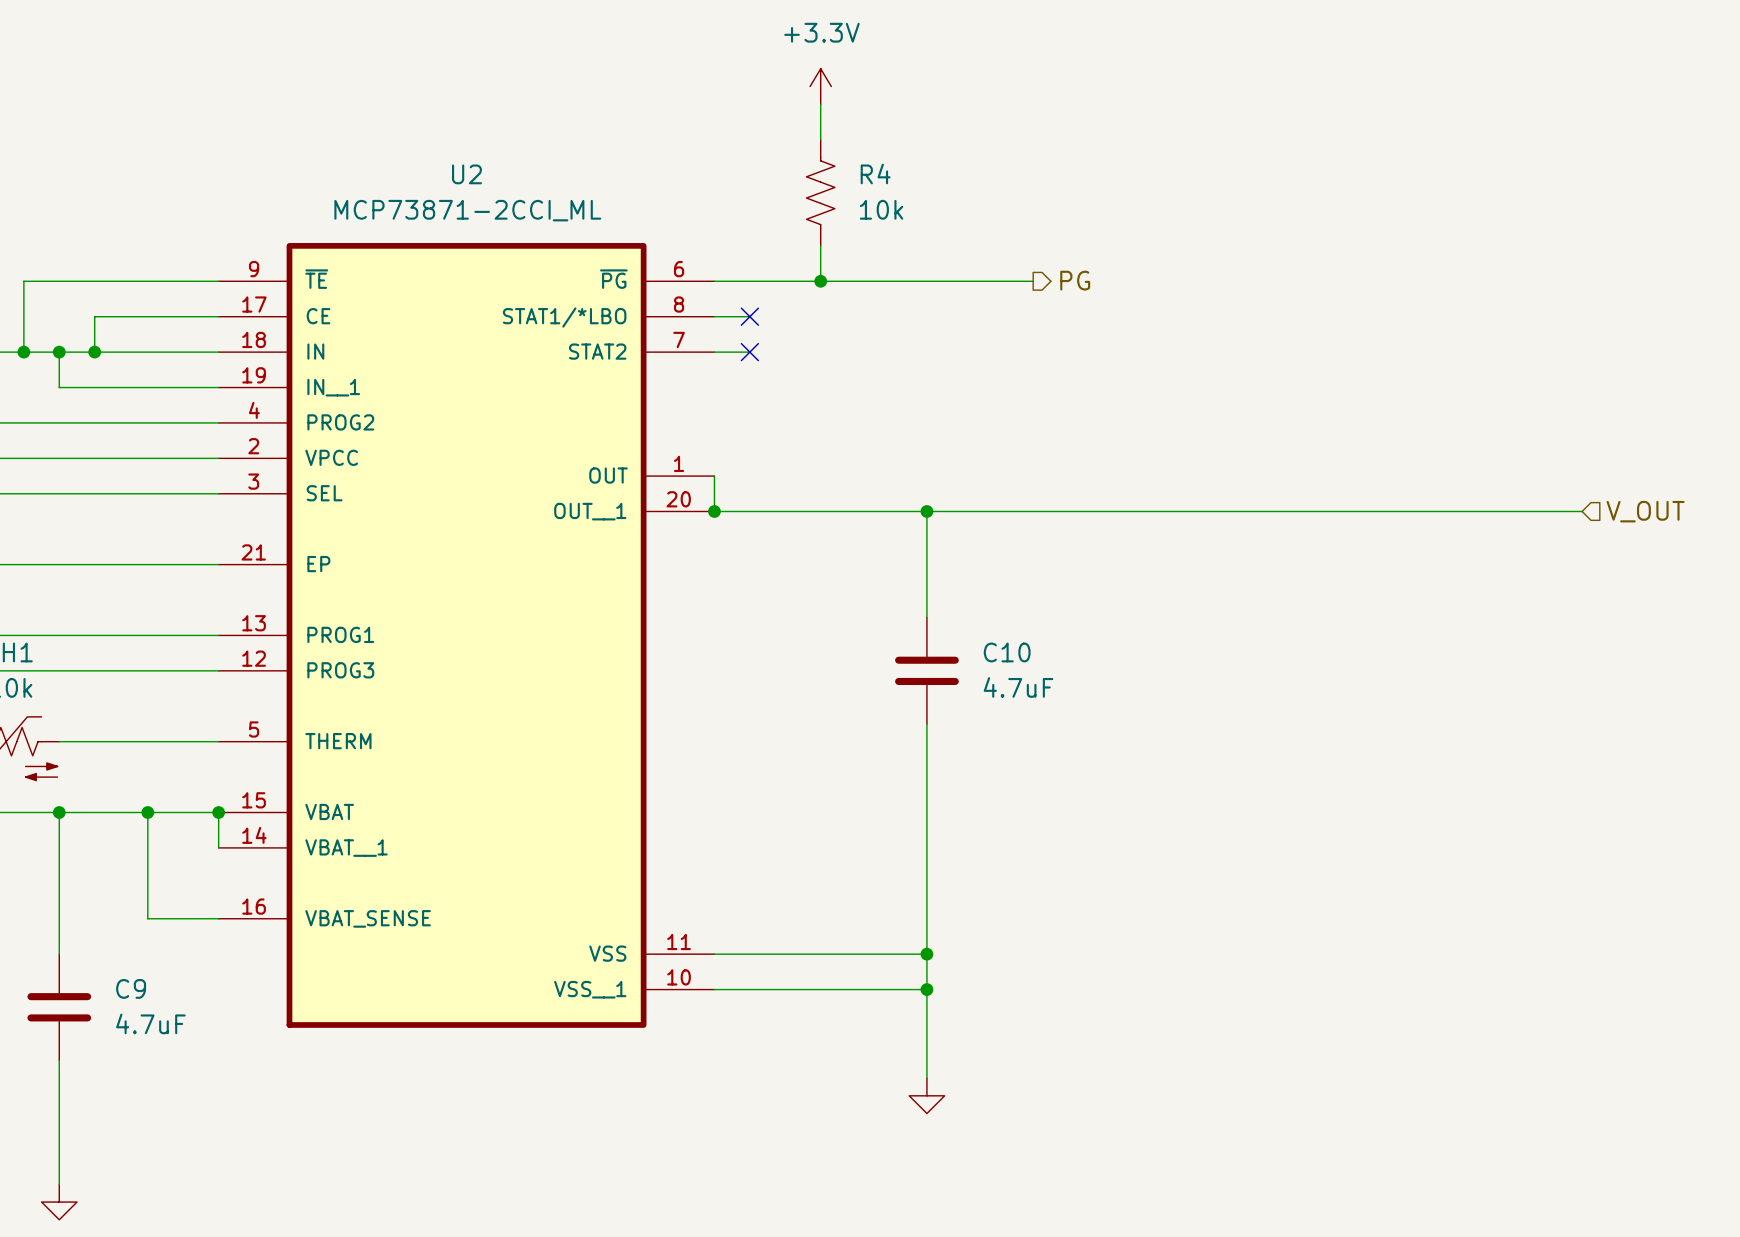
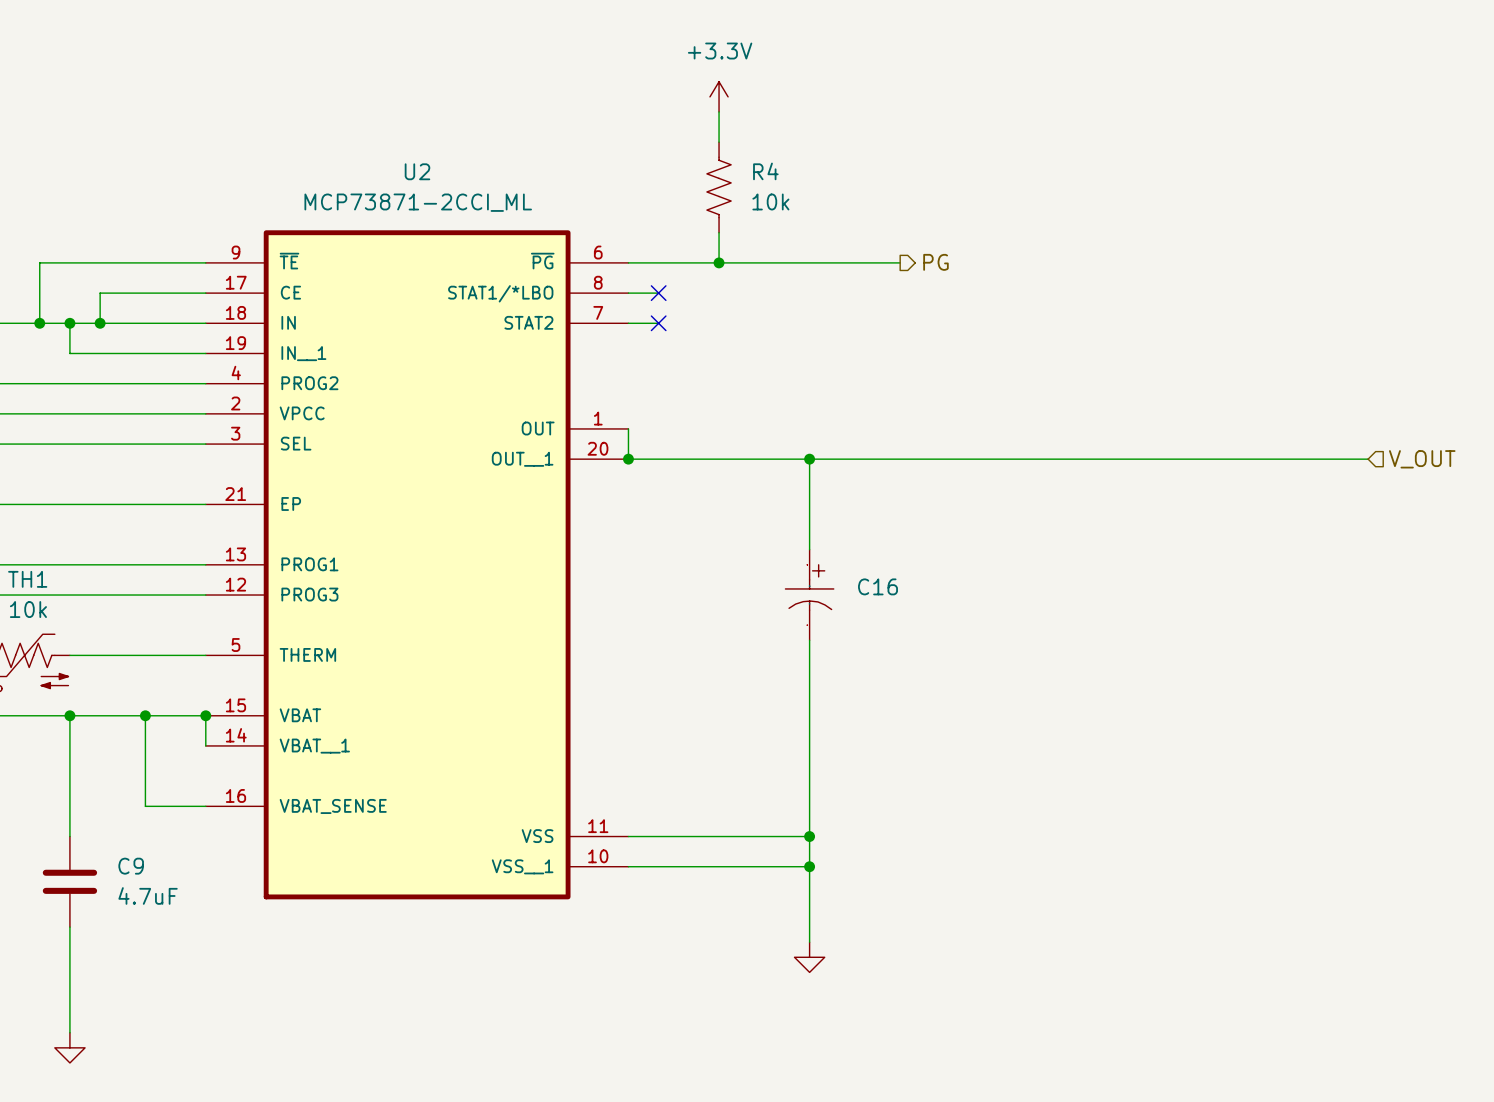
C10: 4.7uF (926, 670) -> none
C16: none -> (809, 595)

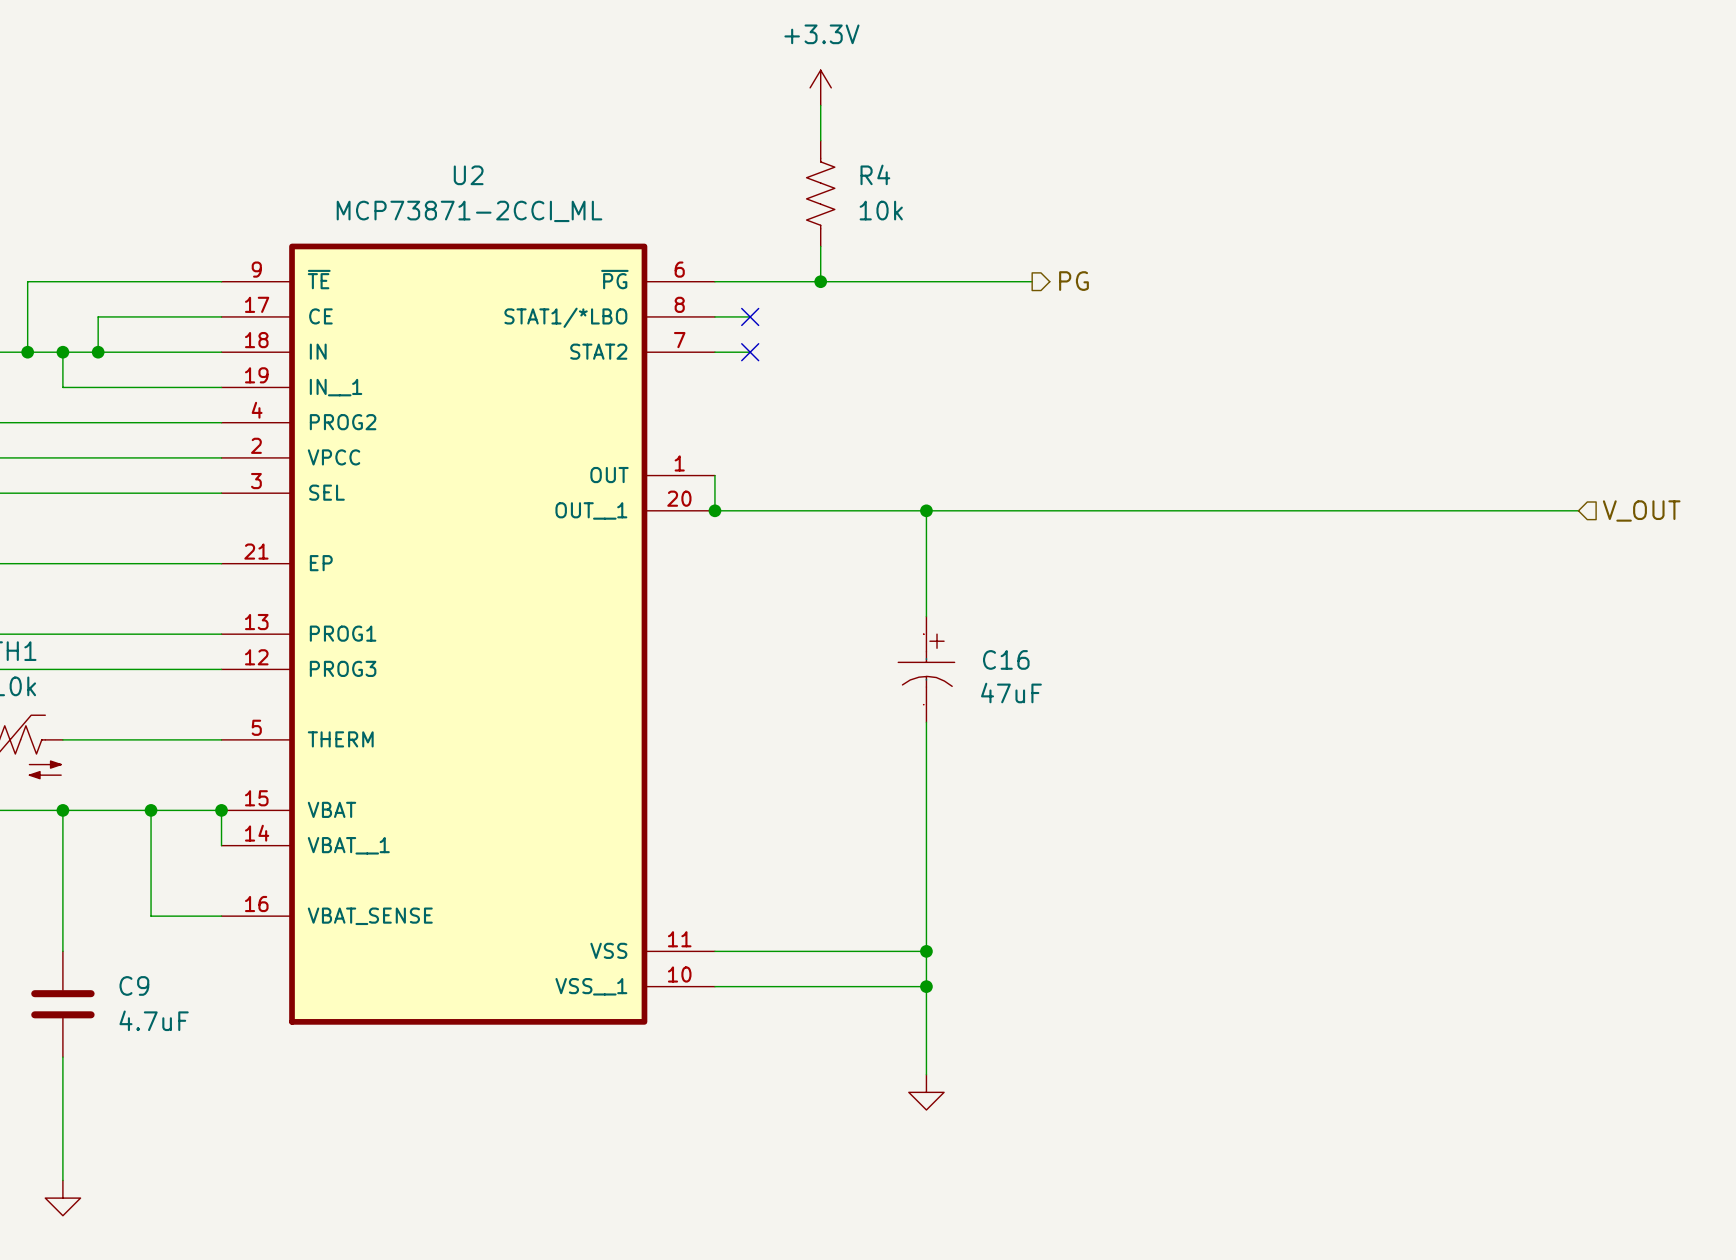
C16 value: none -> 47uF (1011, 693)

